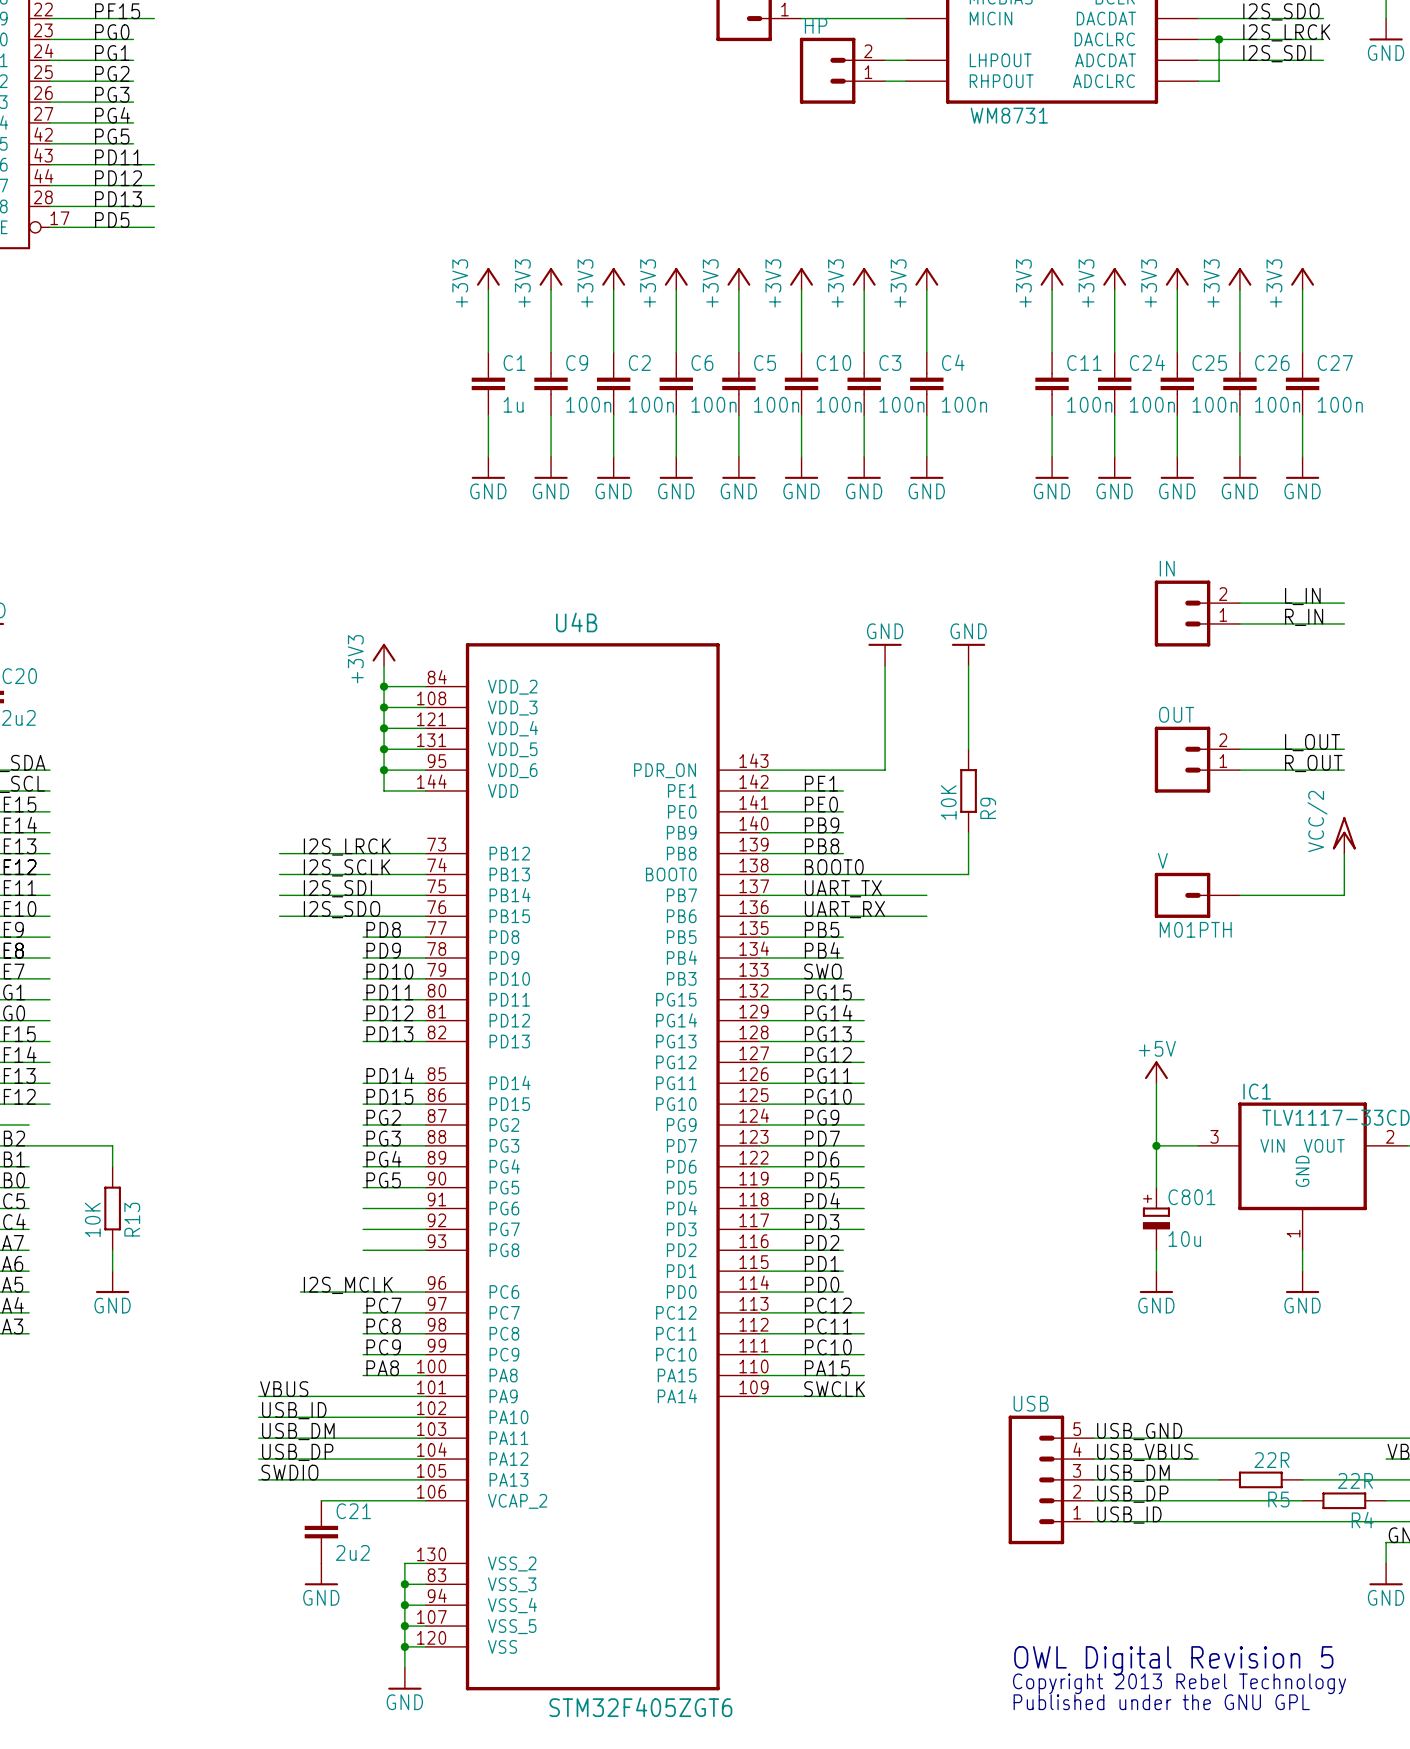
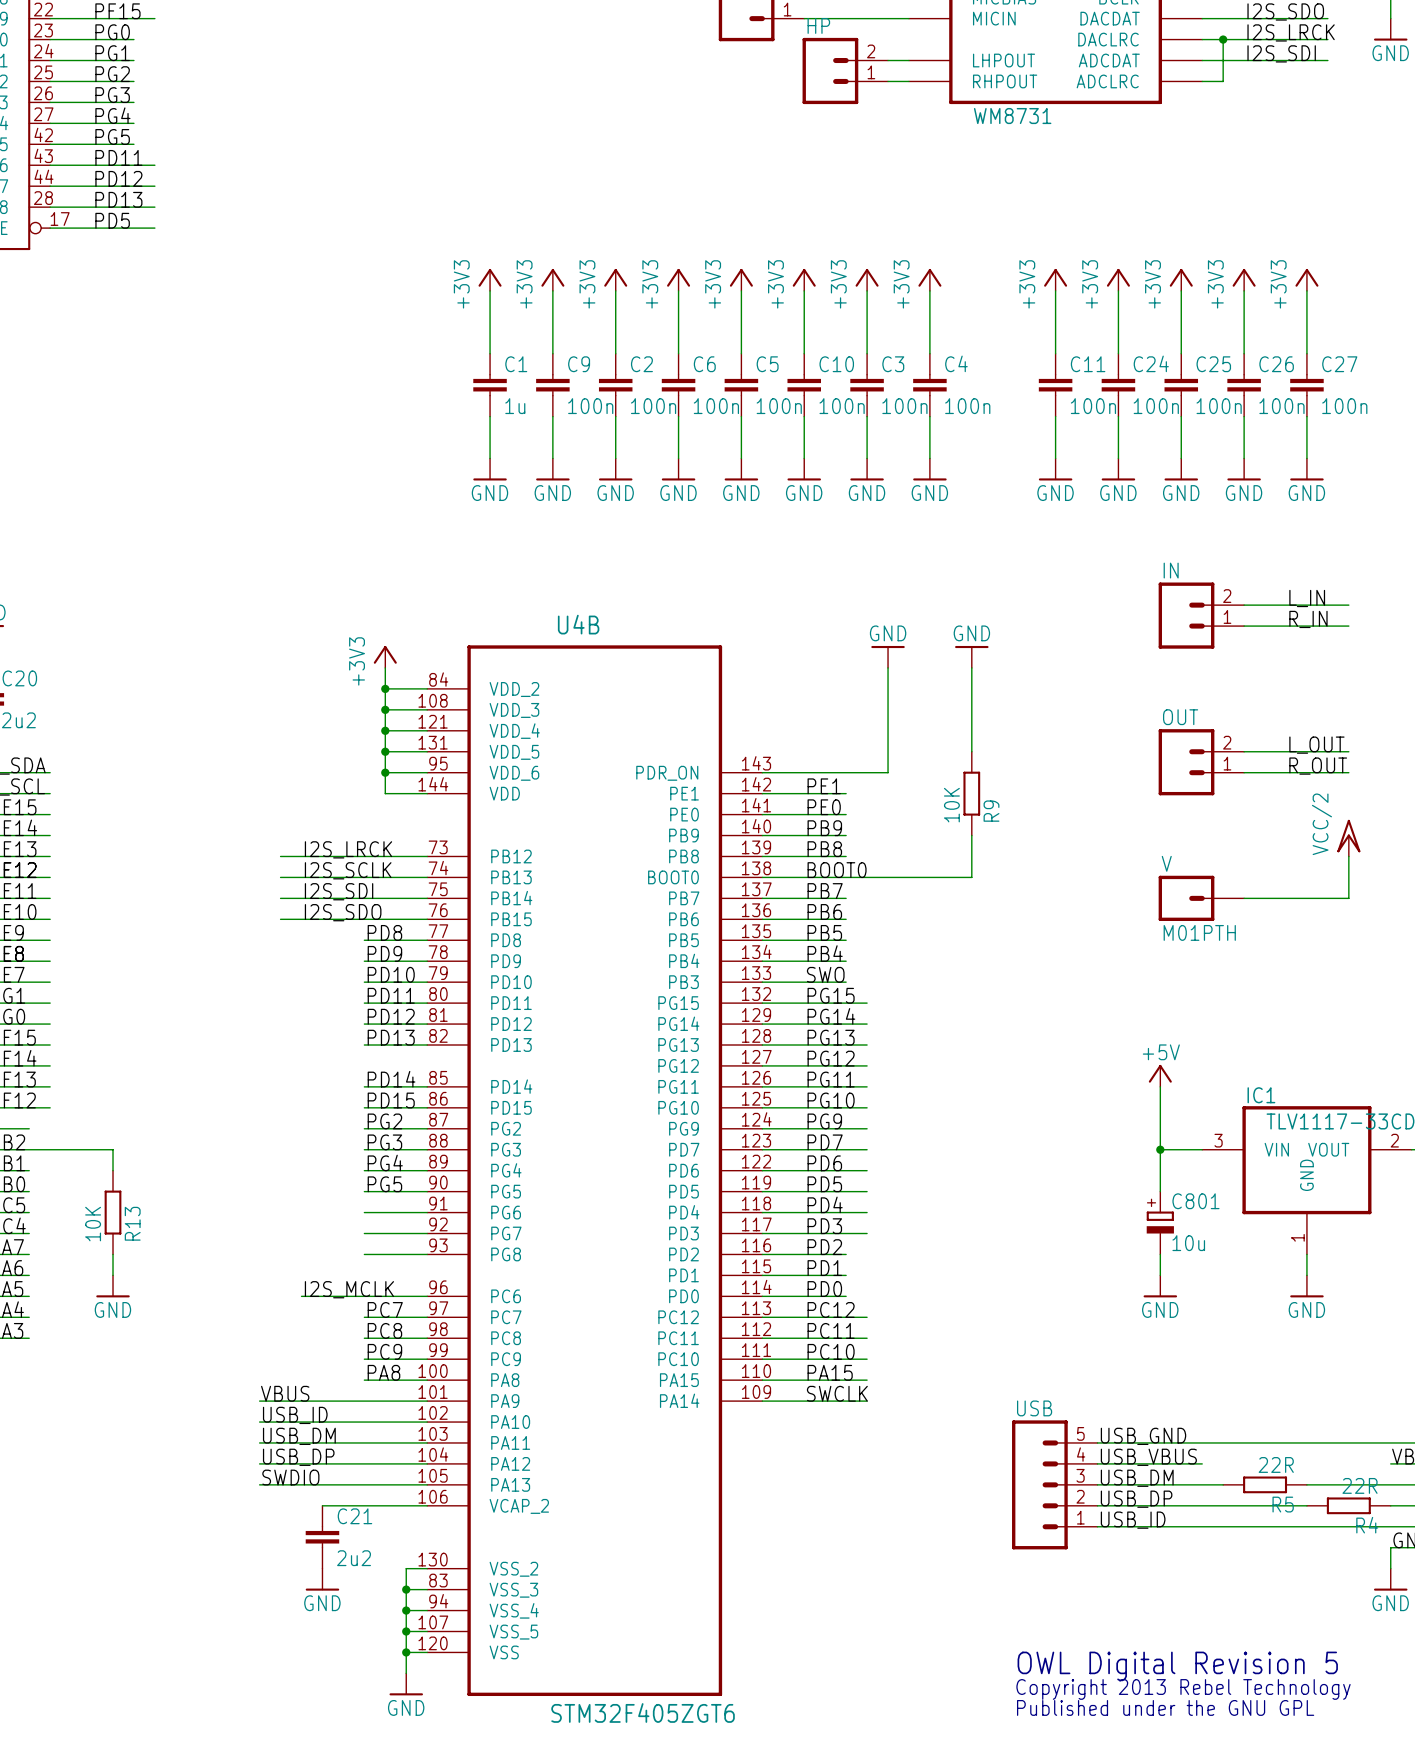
label: UART_TX (843, 888) -> PB7 (825, 891)
wire: (843, 895) (926, 895) -> none
label: UART_RX (844, 909) -> PB6 (824, 911)
wire: (843, 916) (926, 916) -> none

